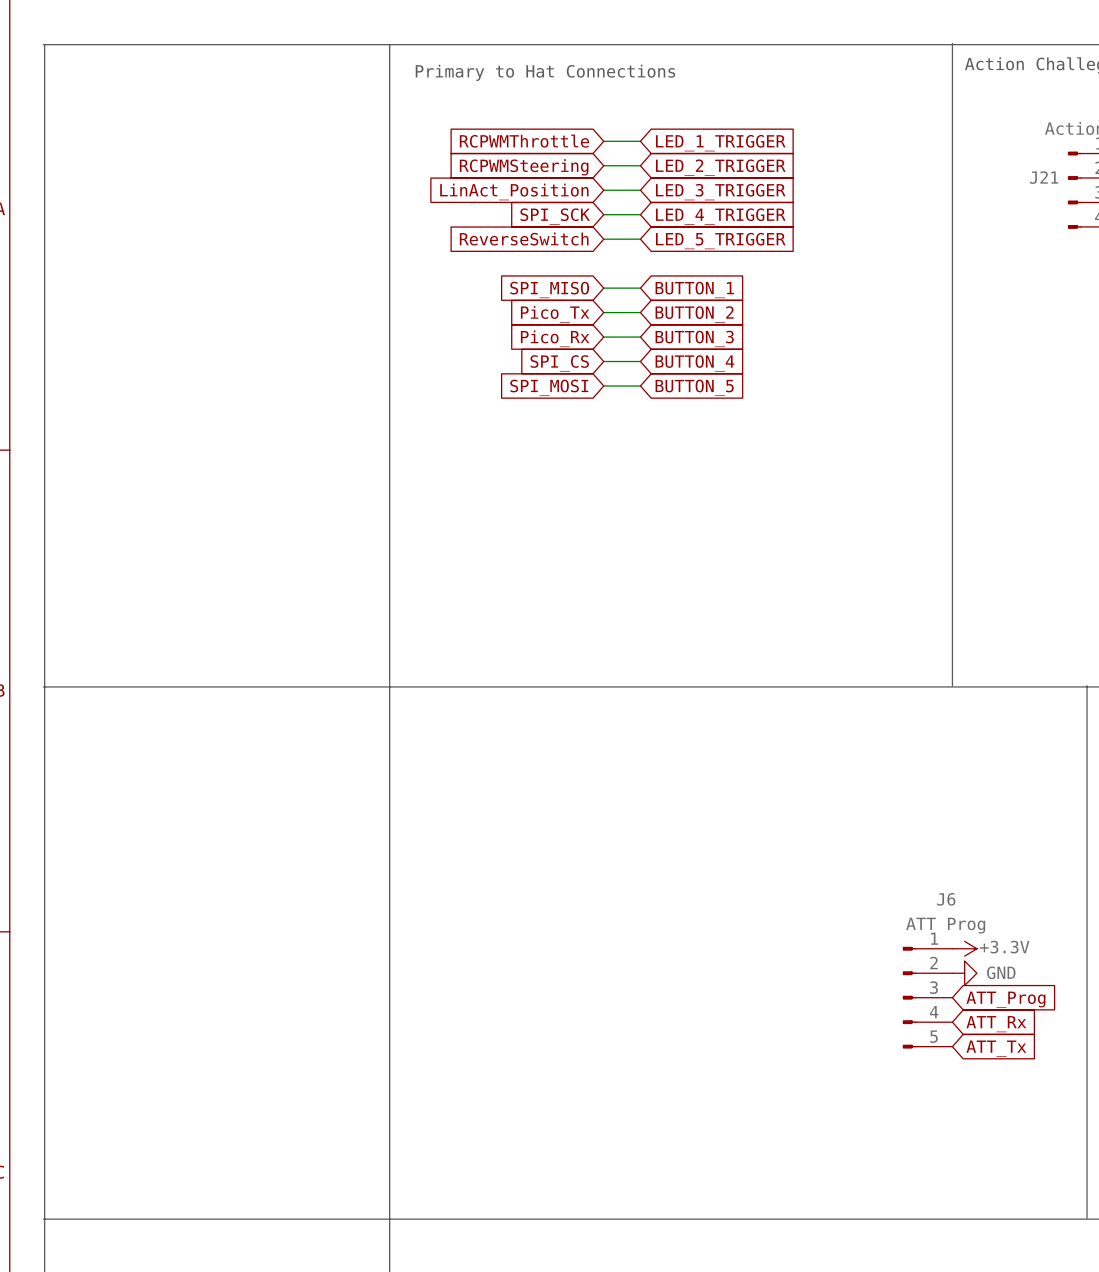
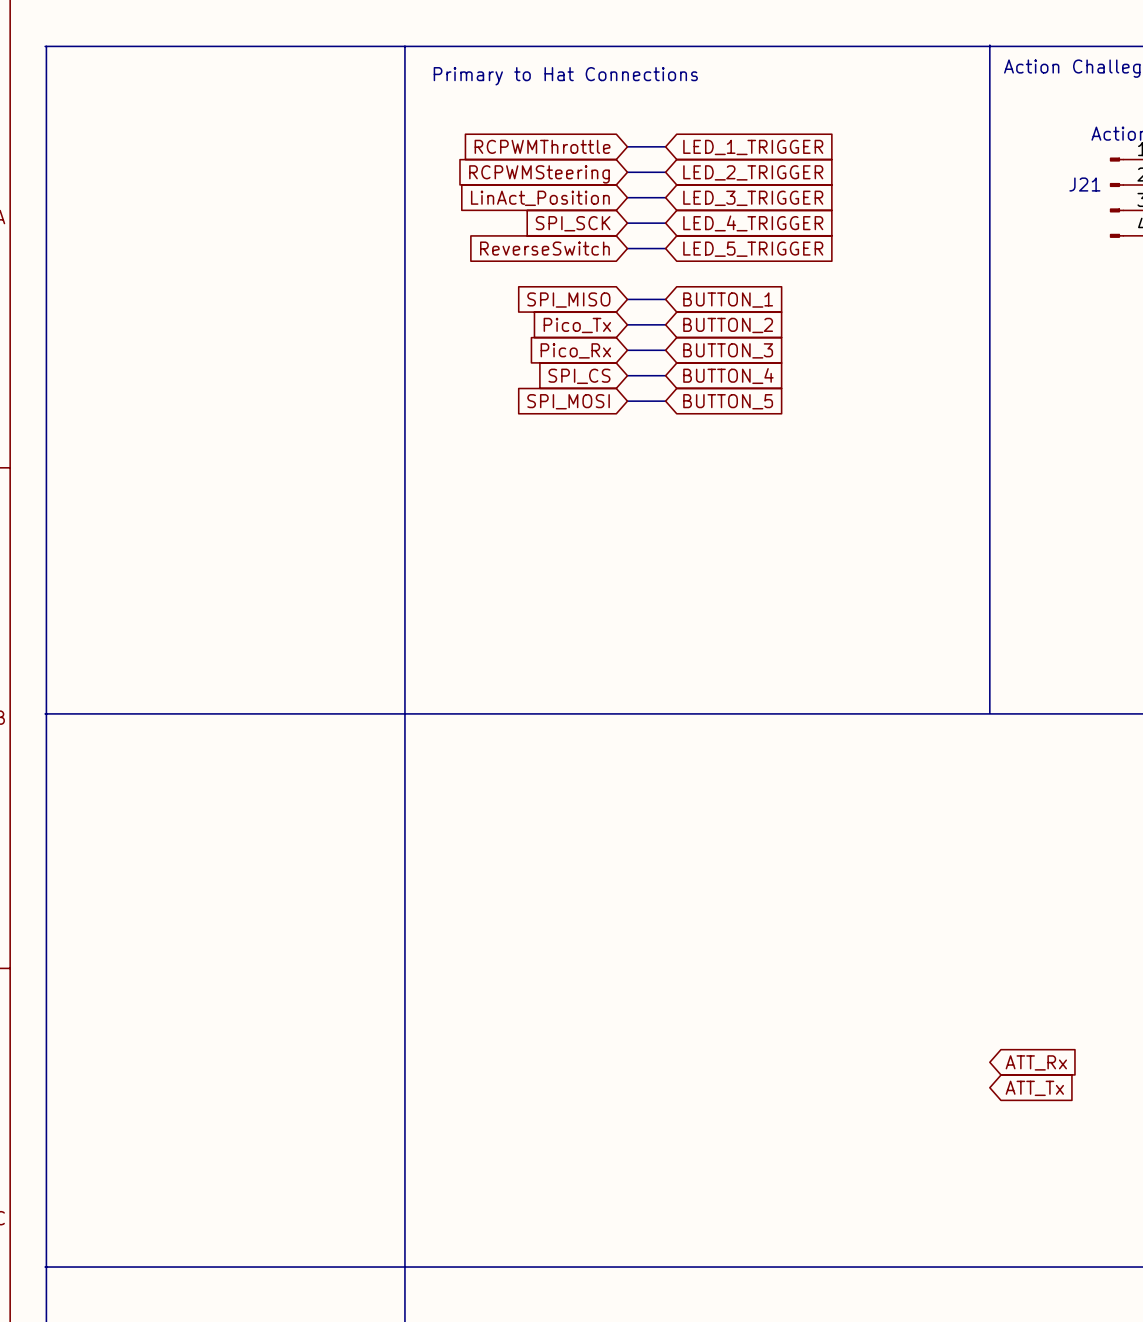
line: (1087, 685) (1087, 1217) -> none
power symbol: +3.3V (964, 948) -> none
power symbol: GND (964, 973) -> none
J6: ATT Prog (927, 997) -> none
global label: ATT_Prog (1005, 999) -> none

